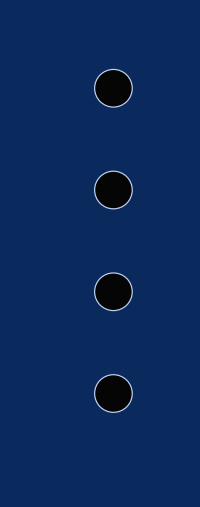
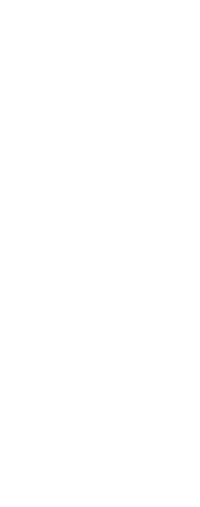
part: (113, 88) -> none
part: (113, 190) -> none
part: (113, 291) -> none
part: (113, 393) -> none

